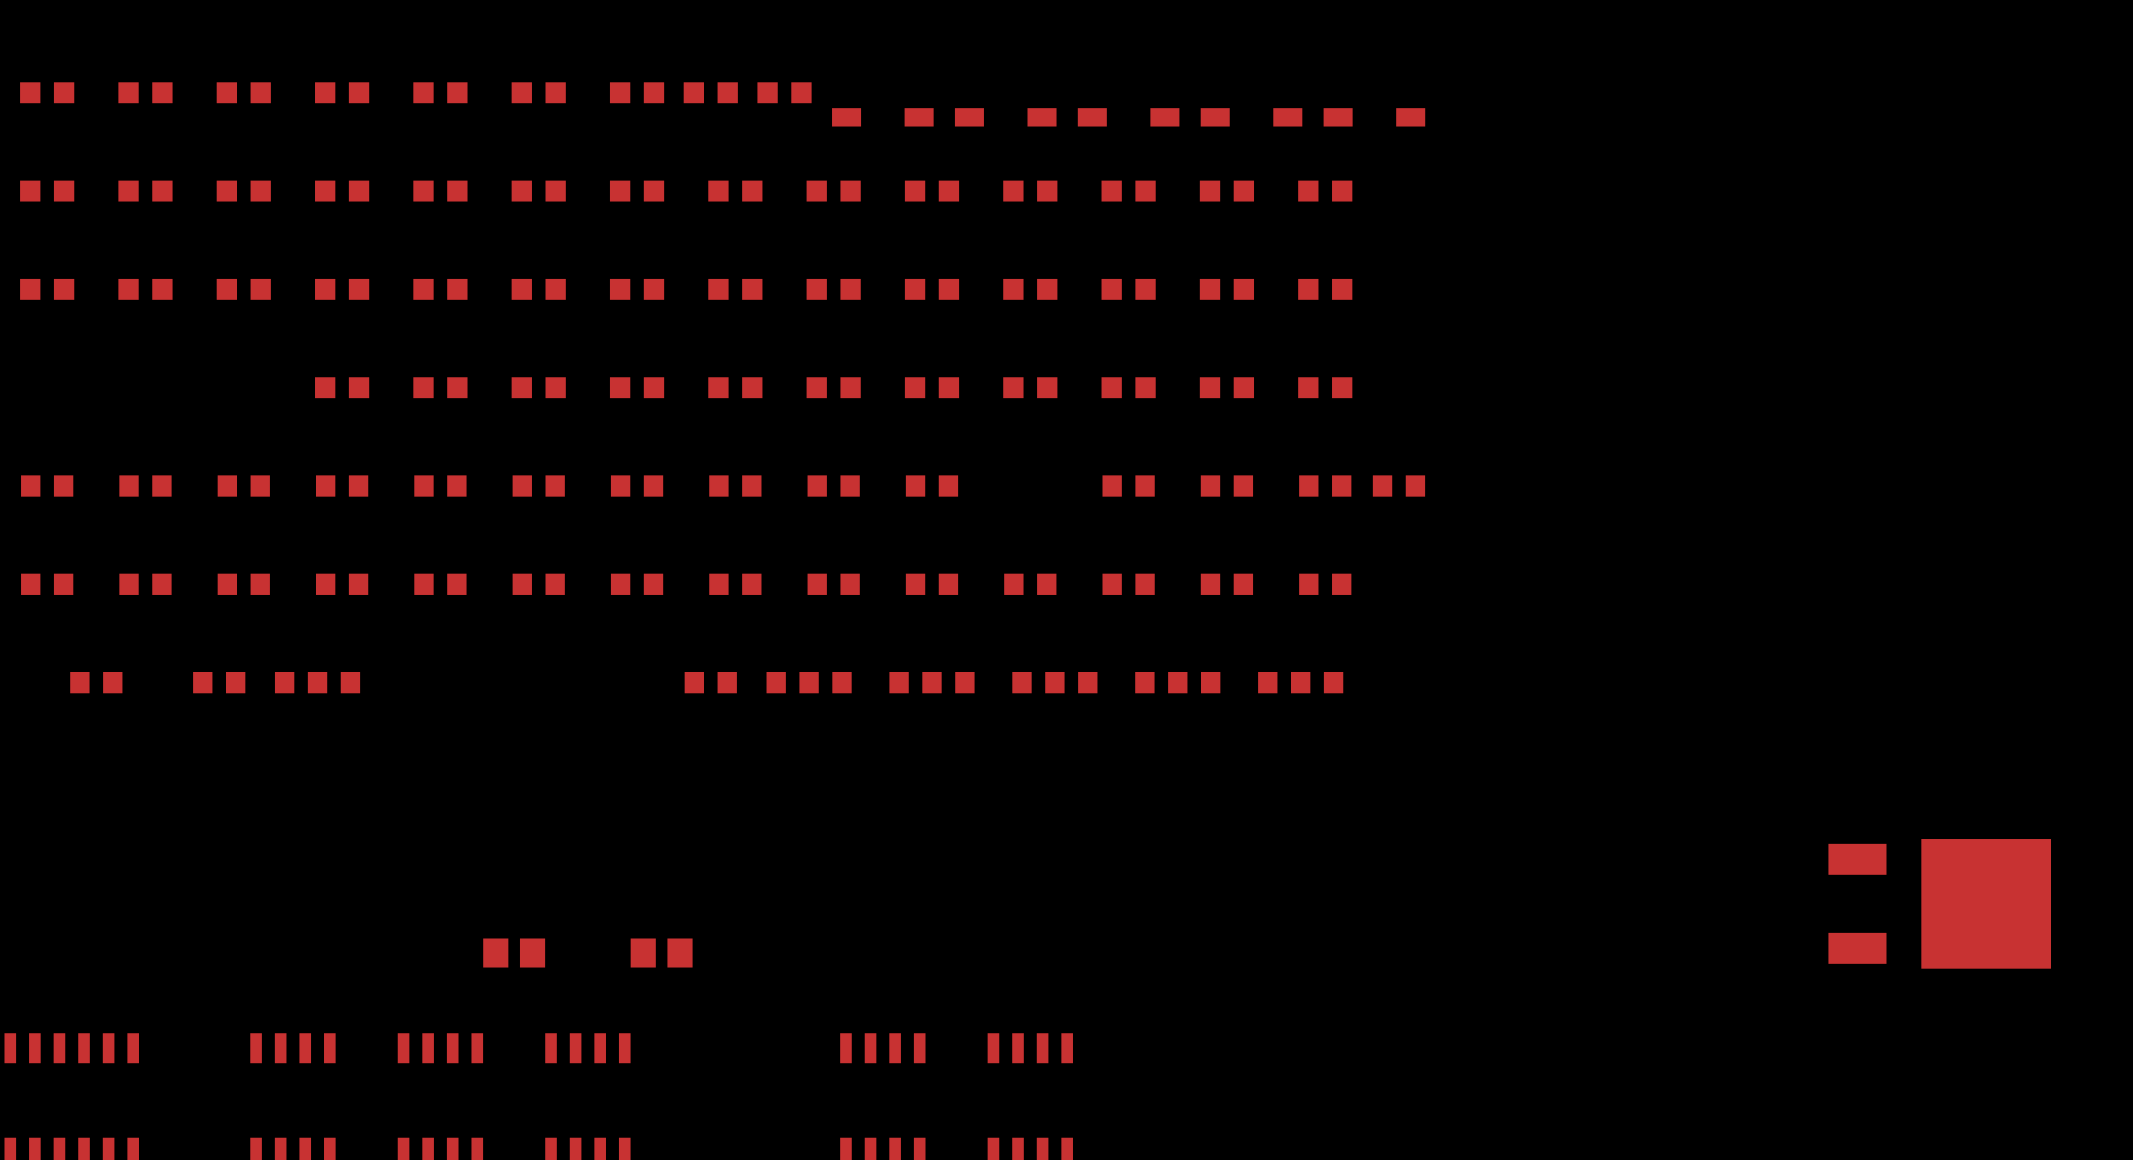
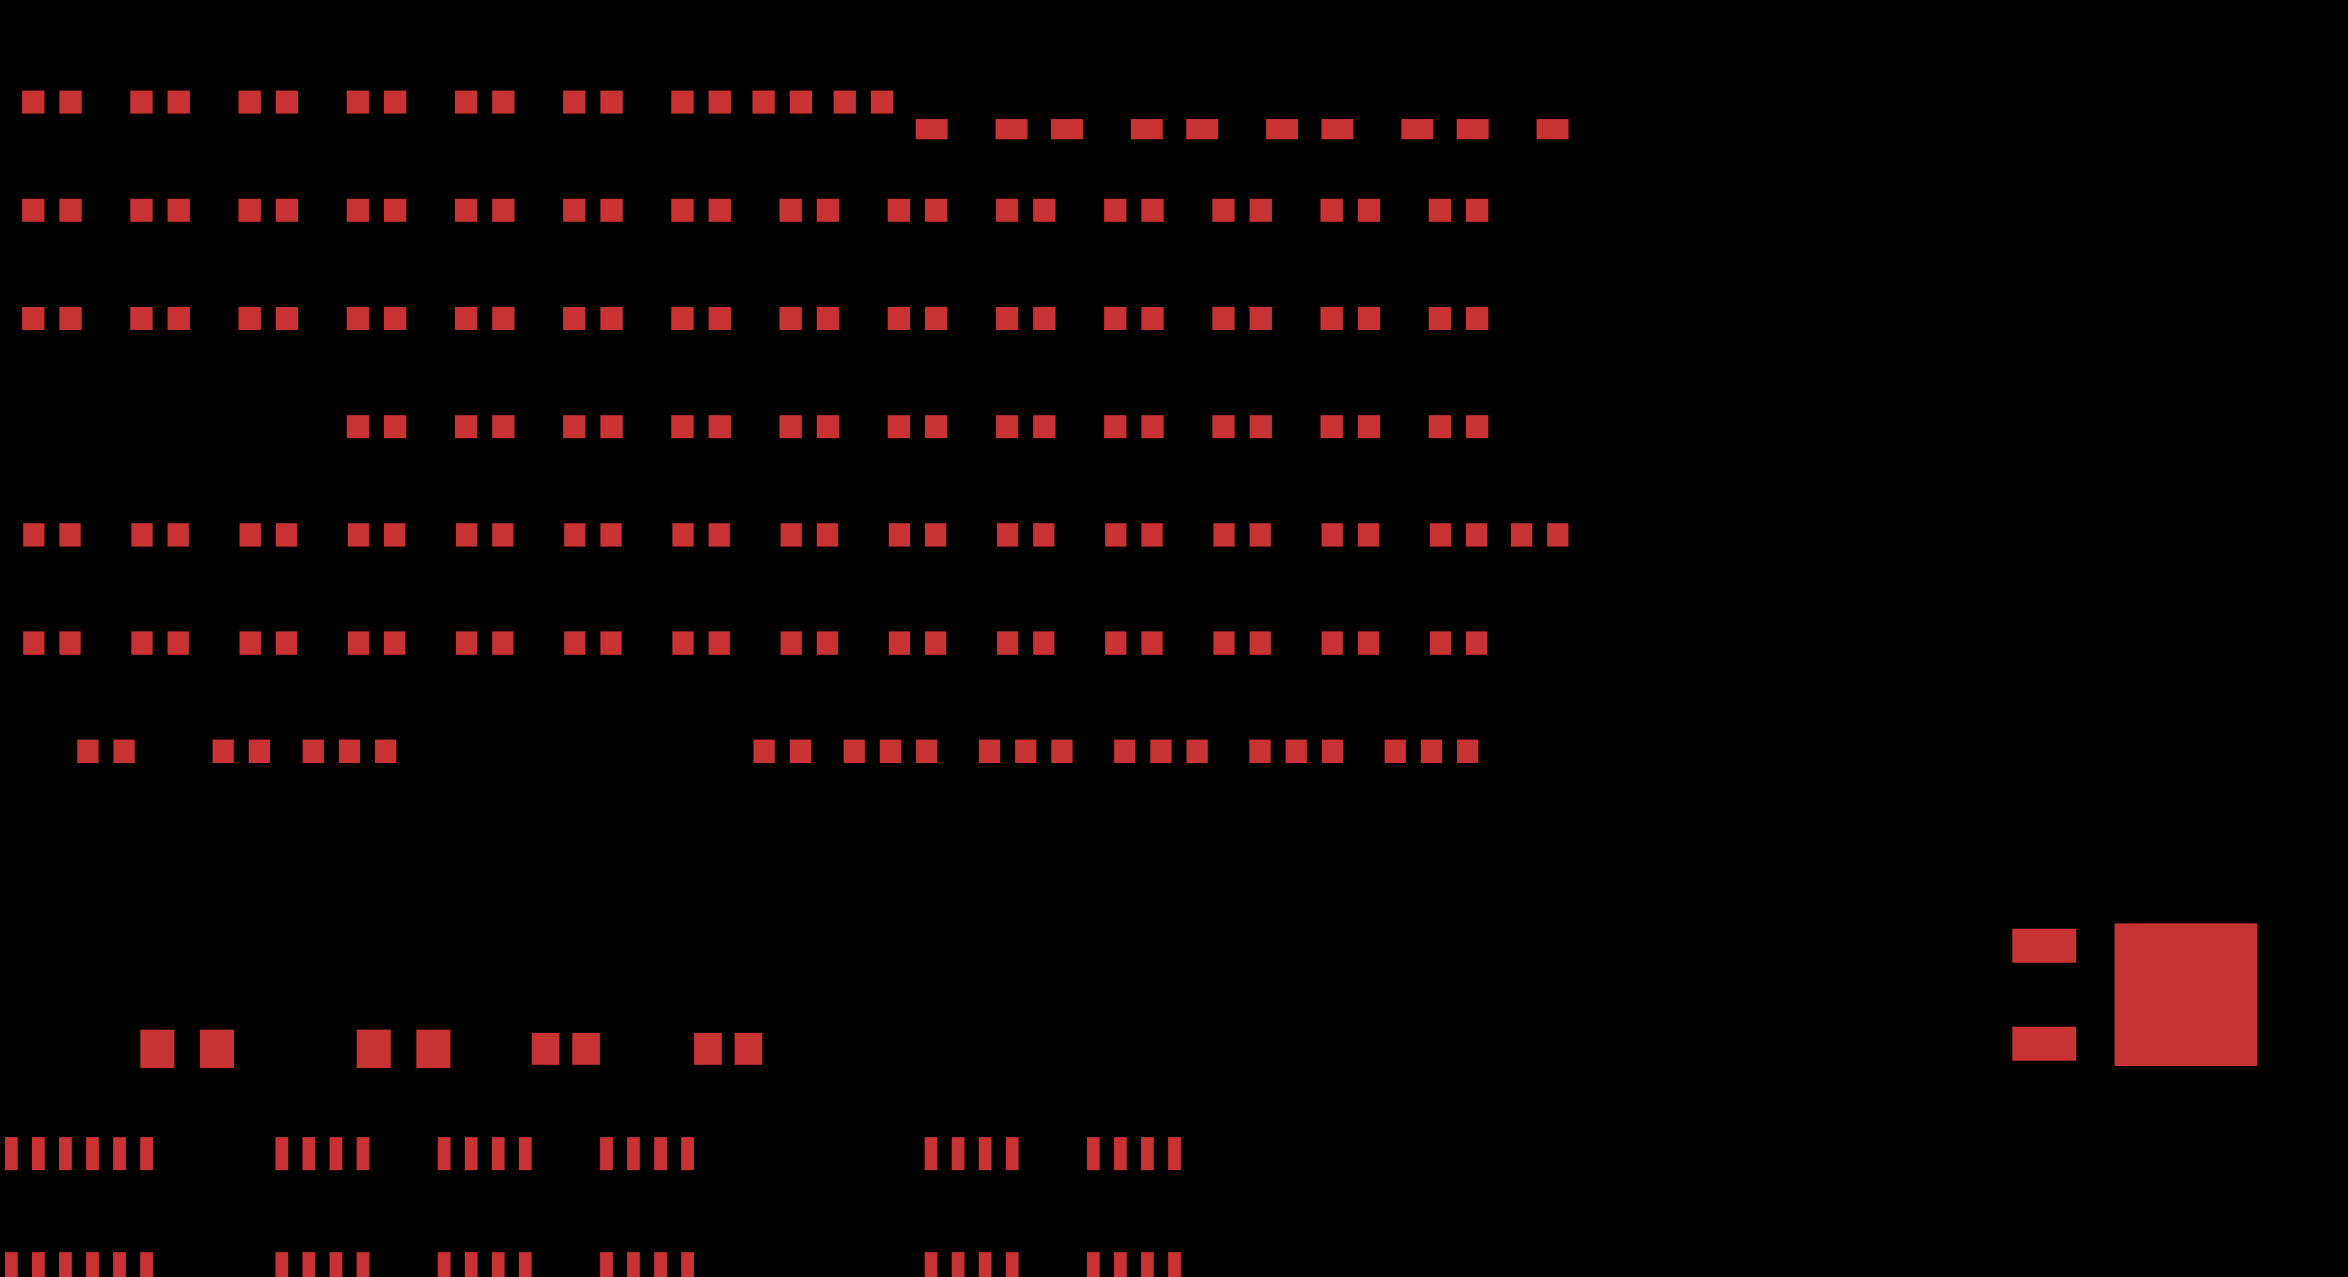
part: none -> (1133, 534)
part: none -> (187, 1048)
part: none -> (403, 1048)

